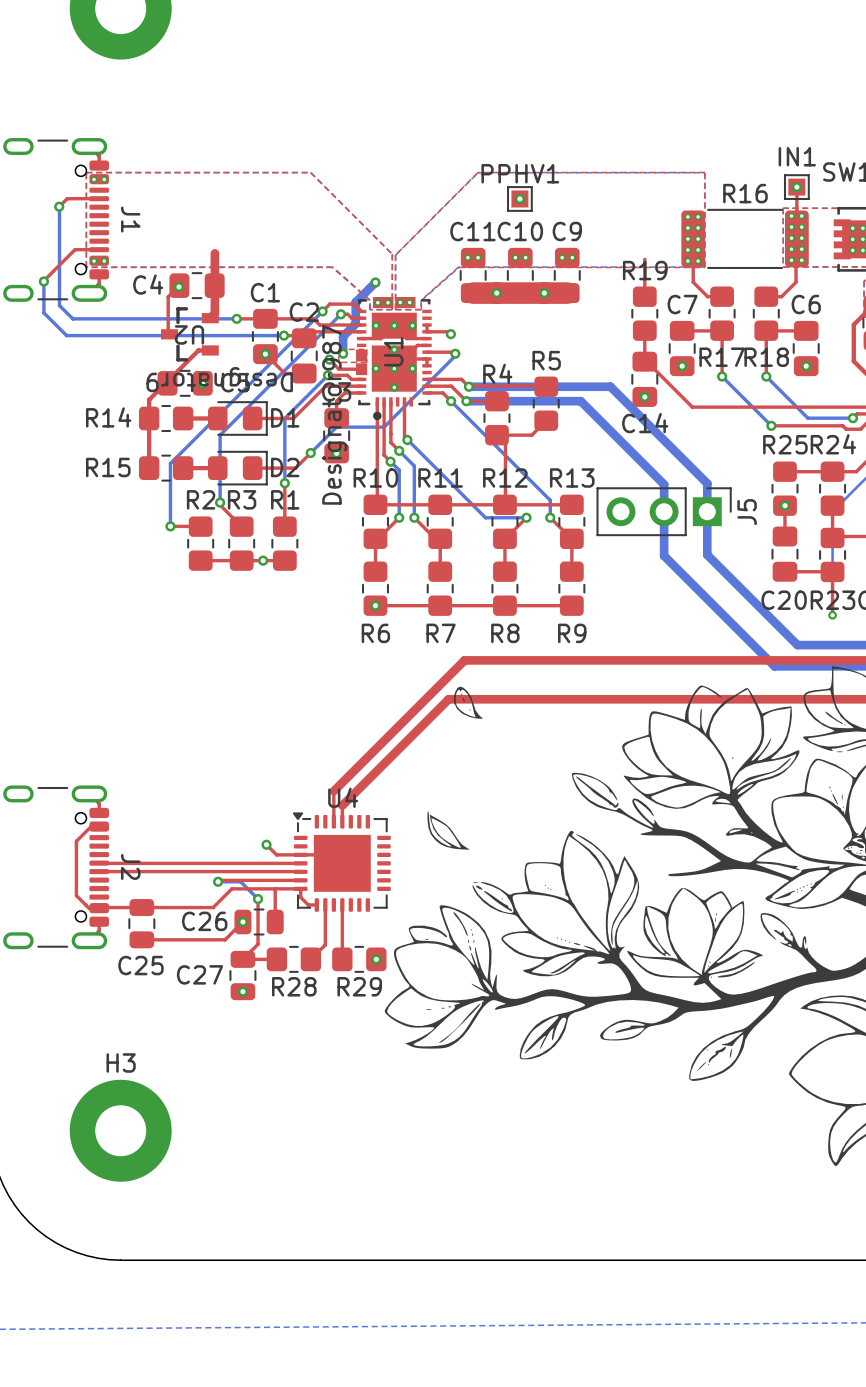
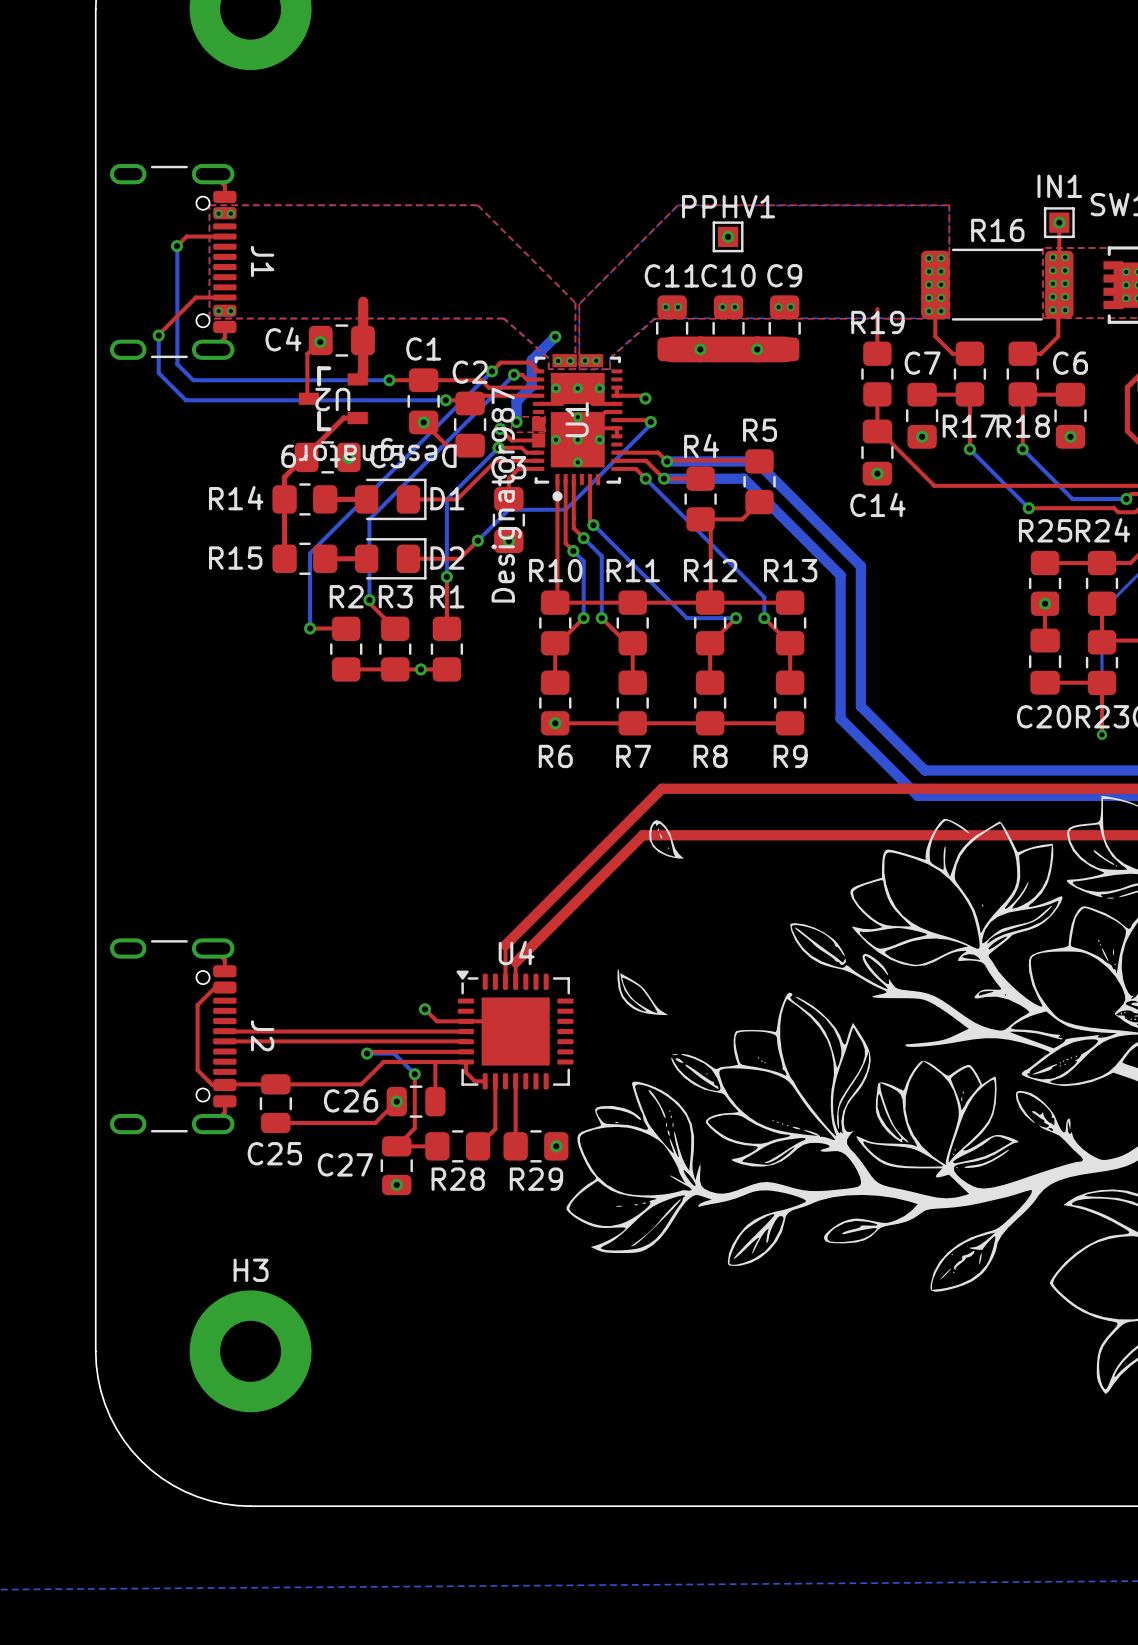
bottom track: (543, 386) (610, 386) (707, 483) (707, 554) (797, 645) -> (756, 461) (860, 566) (860, 706) (924, 770) (1060, 770)
bottom track: (533, 401) (580, 401) (664, 484) (664, 555) (774, 666) -> (743, 478) (840, 575) (840, 718) (917, 795) (1032, 795)
J5: (664, 511) -> none

